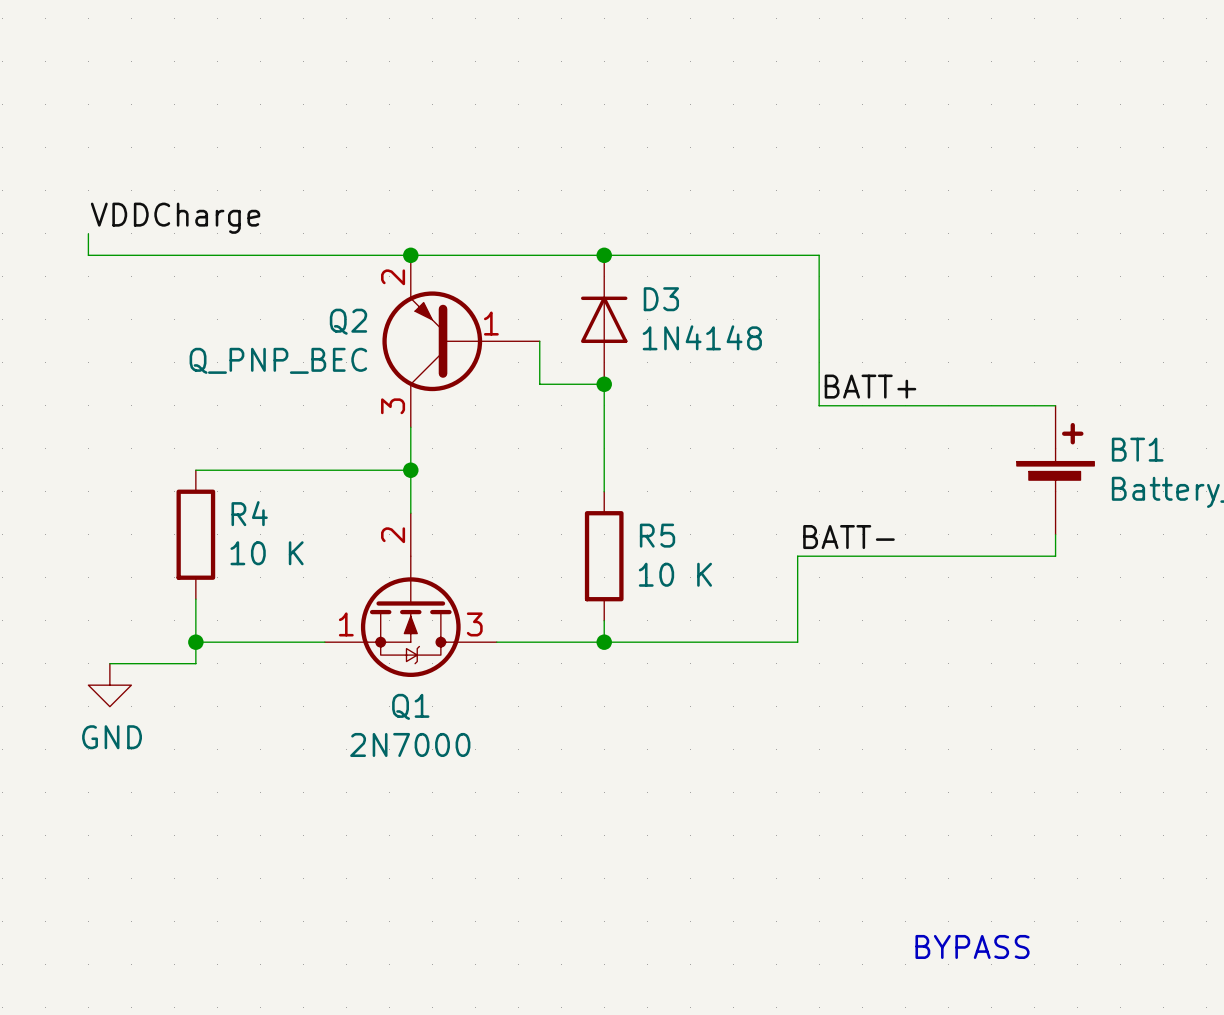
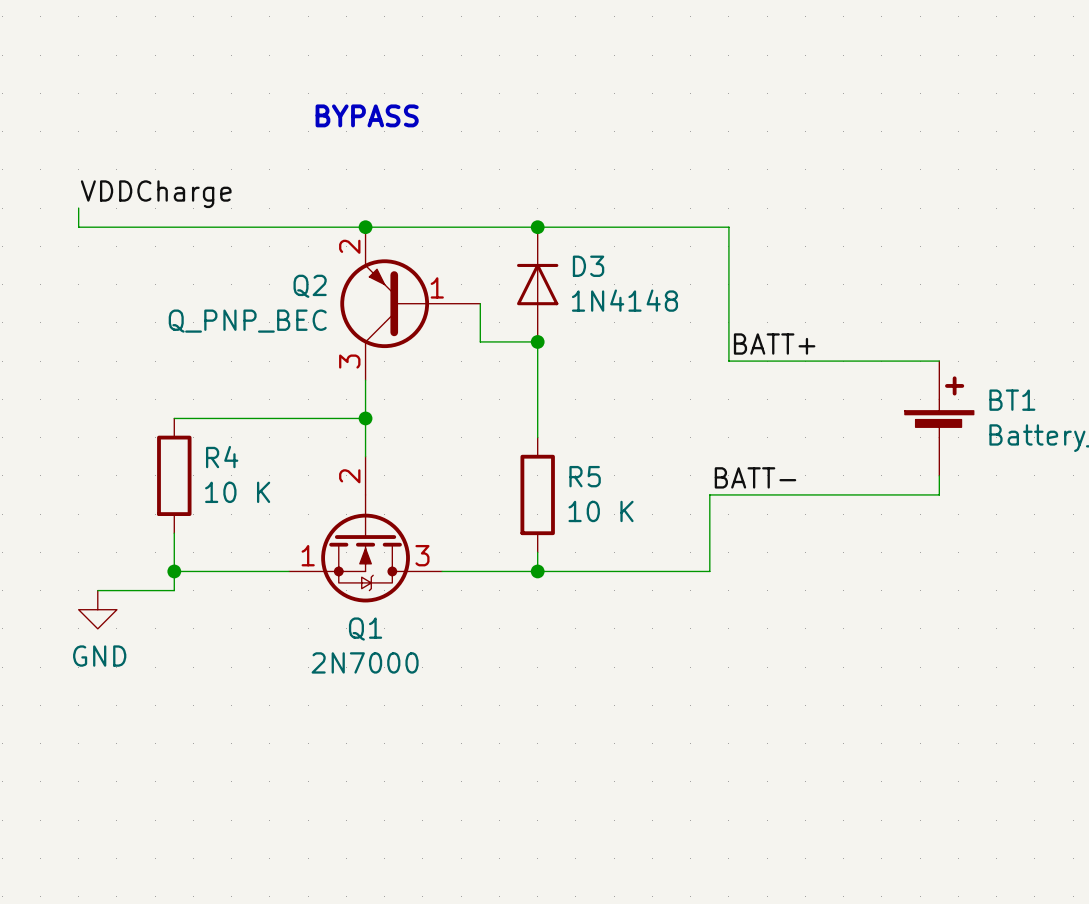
text: none -> BYPASS (367, 115)
text: BYPASS (972, 946) -> none

